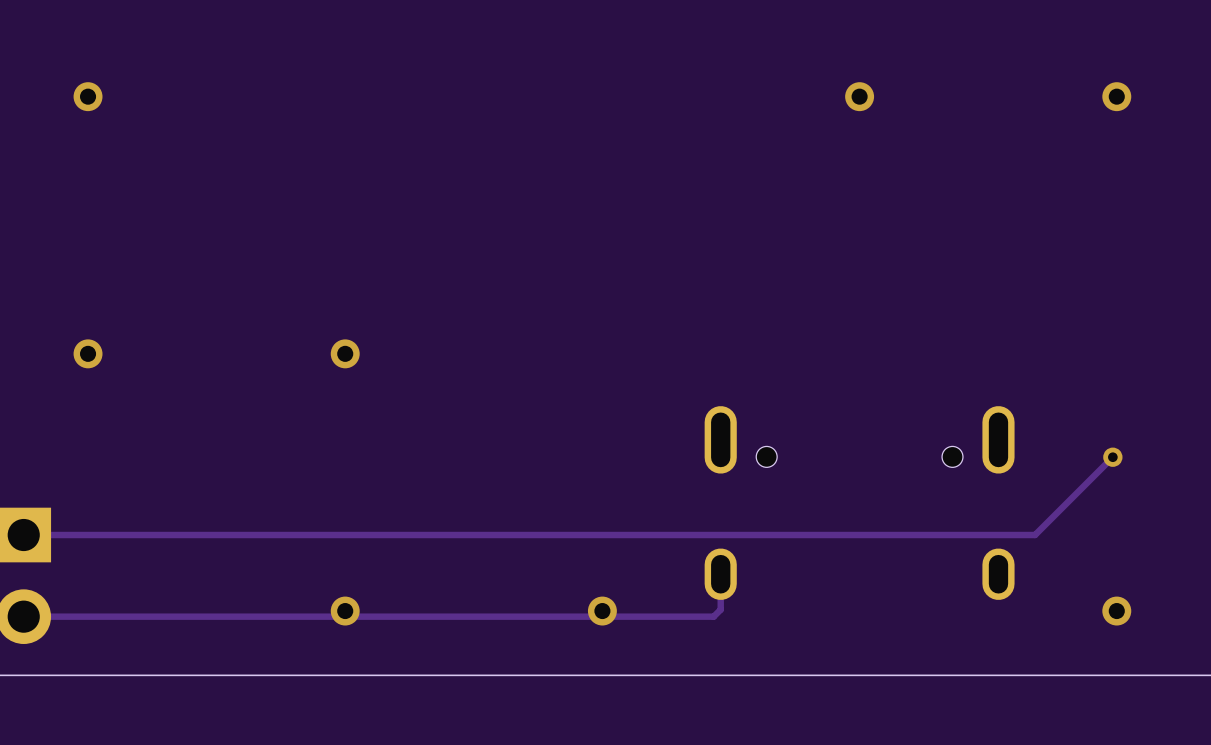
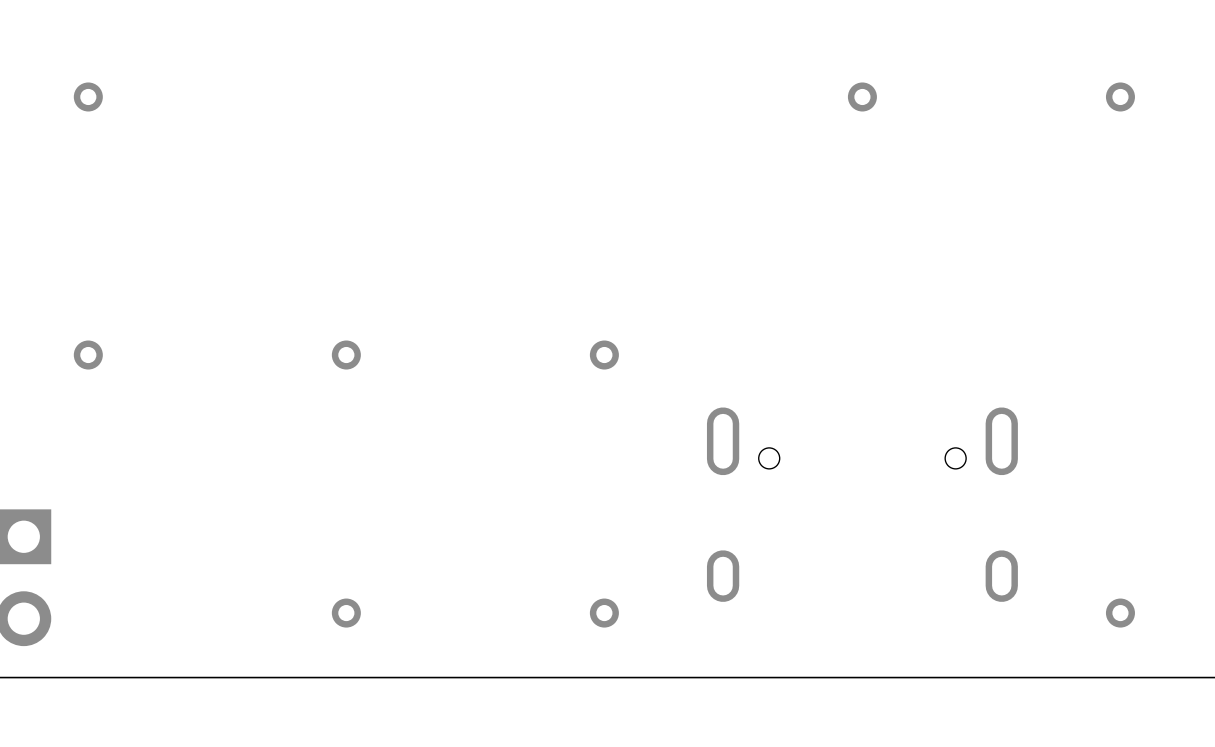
via: none -> (604, 355)
track: (1112, 457) (1035, 535) (23, 535) -> none
via: (1112, 457) -> none
track: (720, 574) (720, 609) (713, 616) (23, 616) -> none

